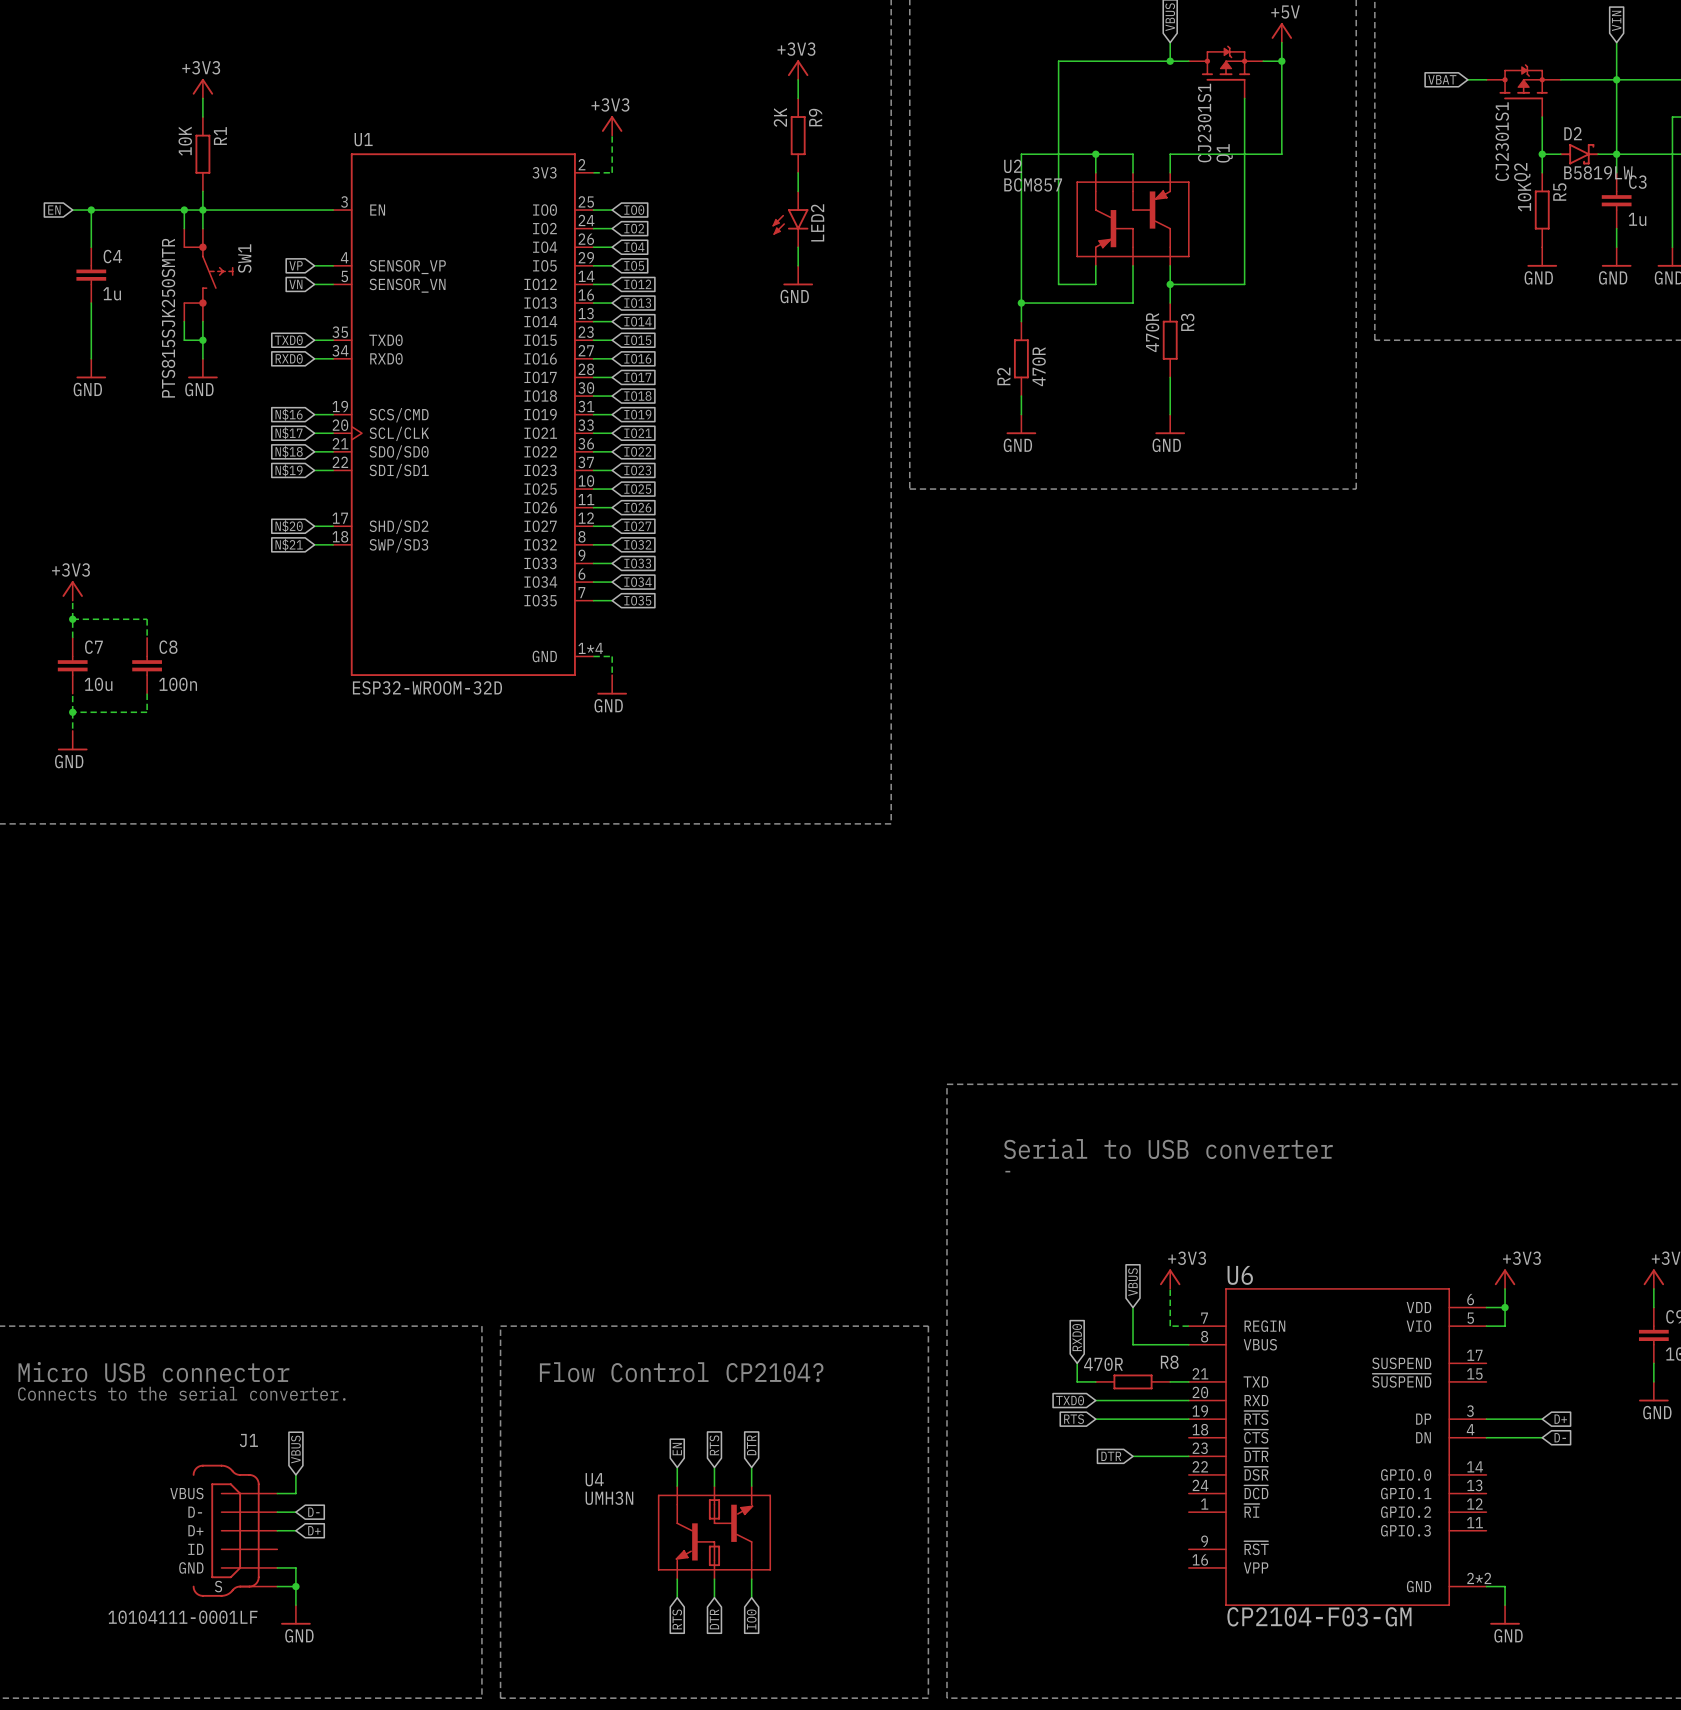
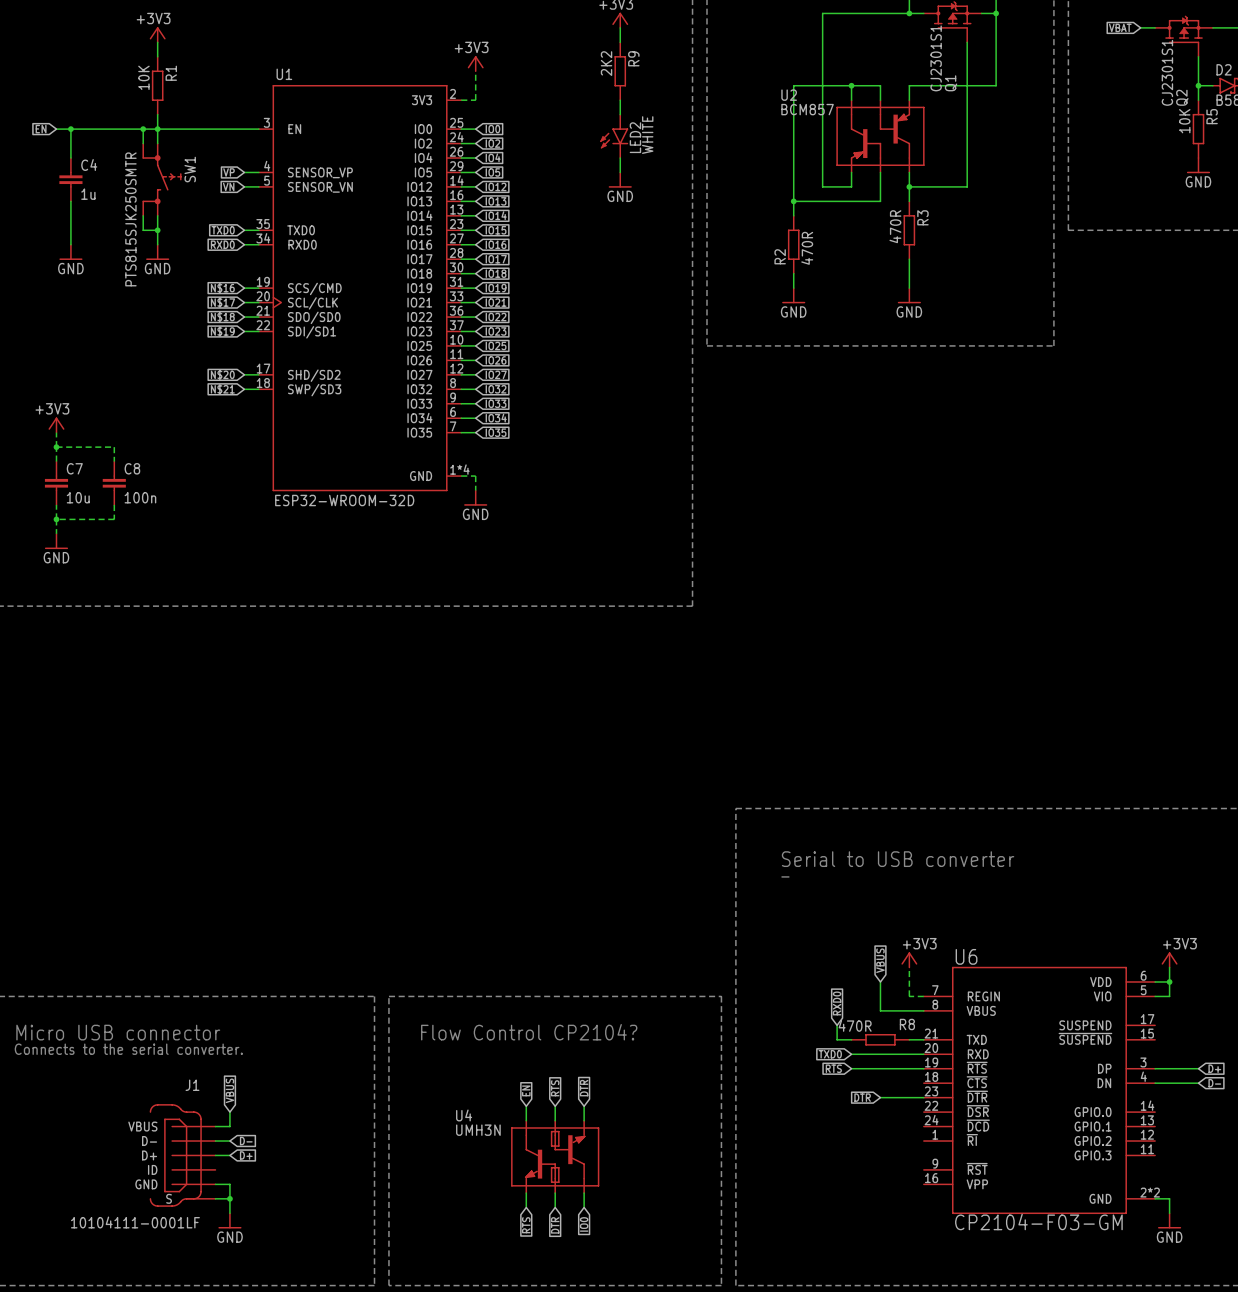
R9 value: 2K (780, 117) -> 2K2 (606, 63)
LED2 value: none -> WHITE (647, 135)

